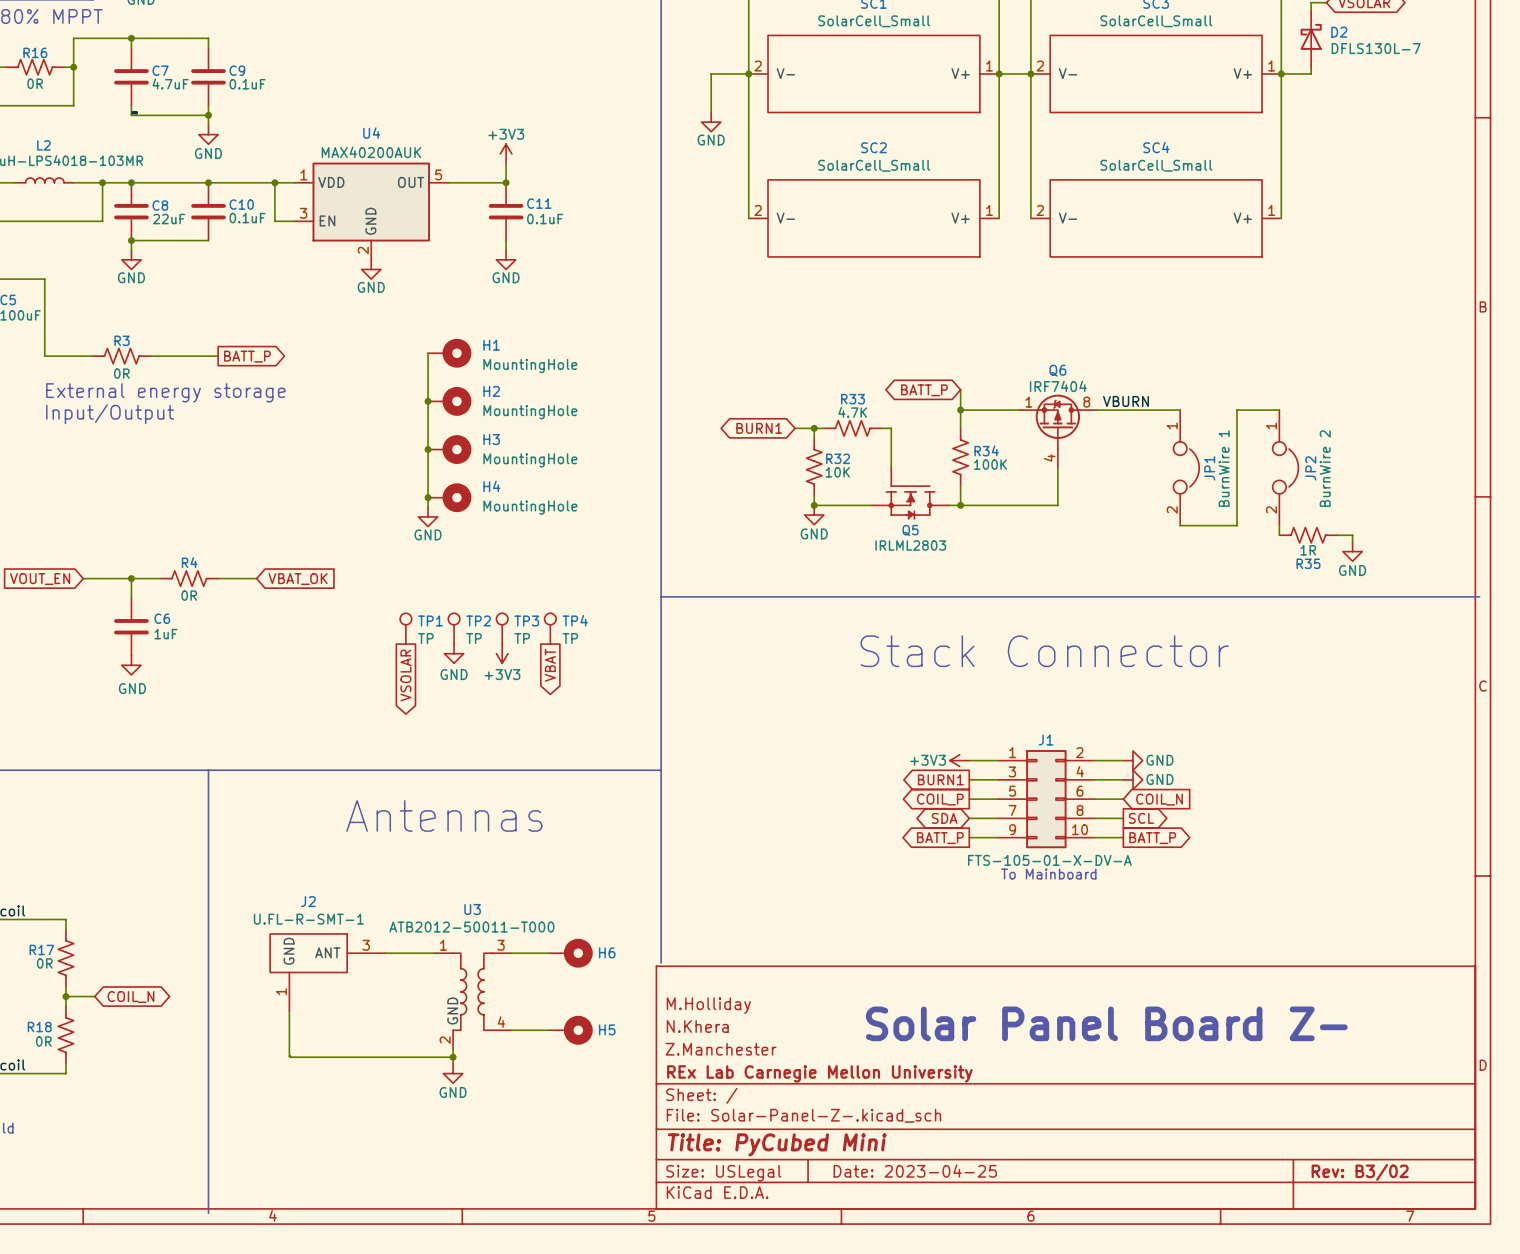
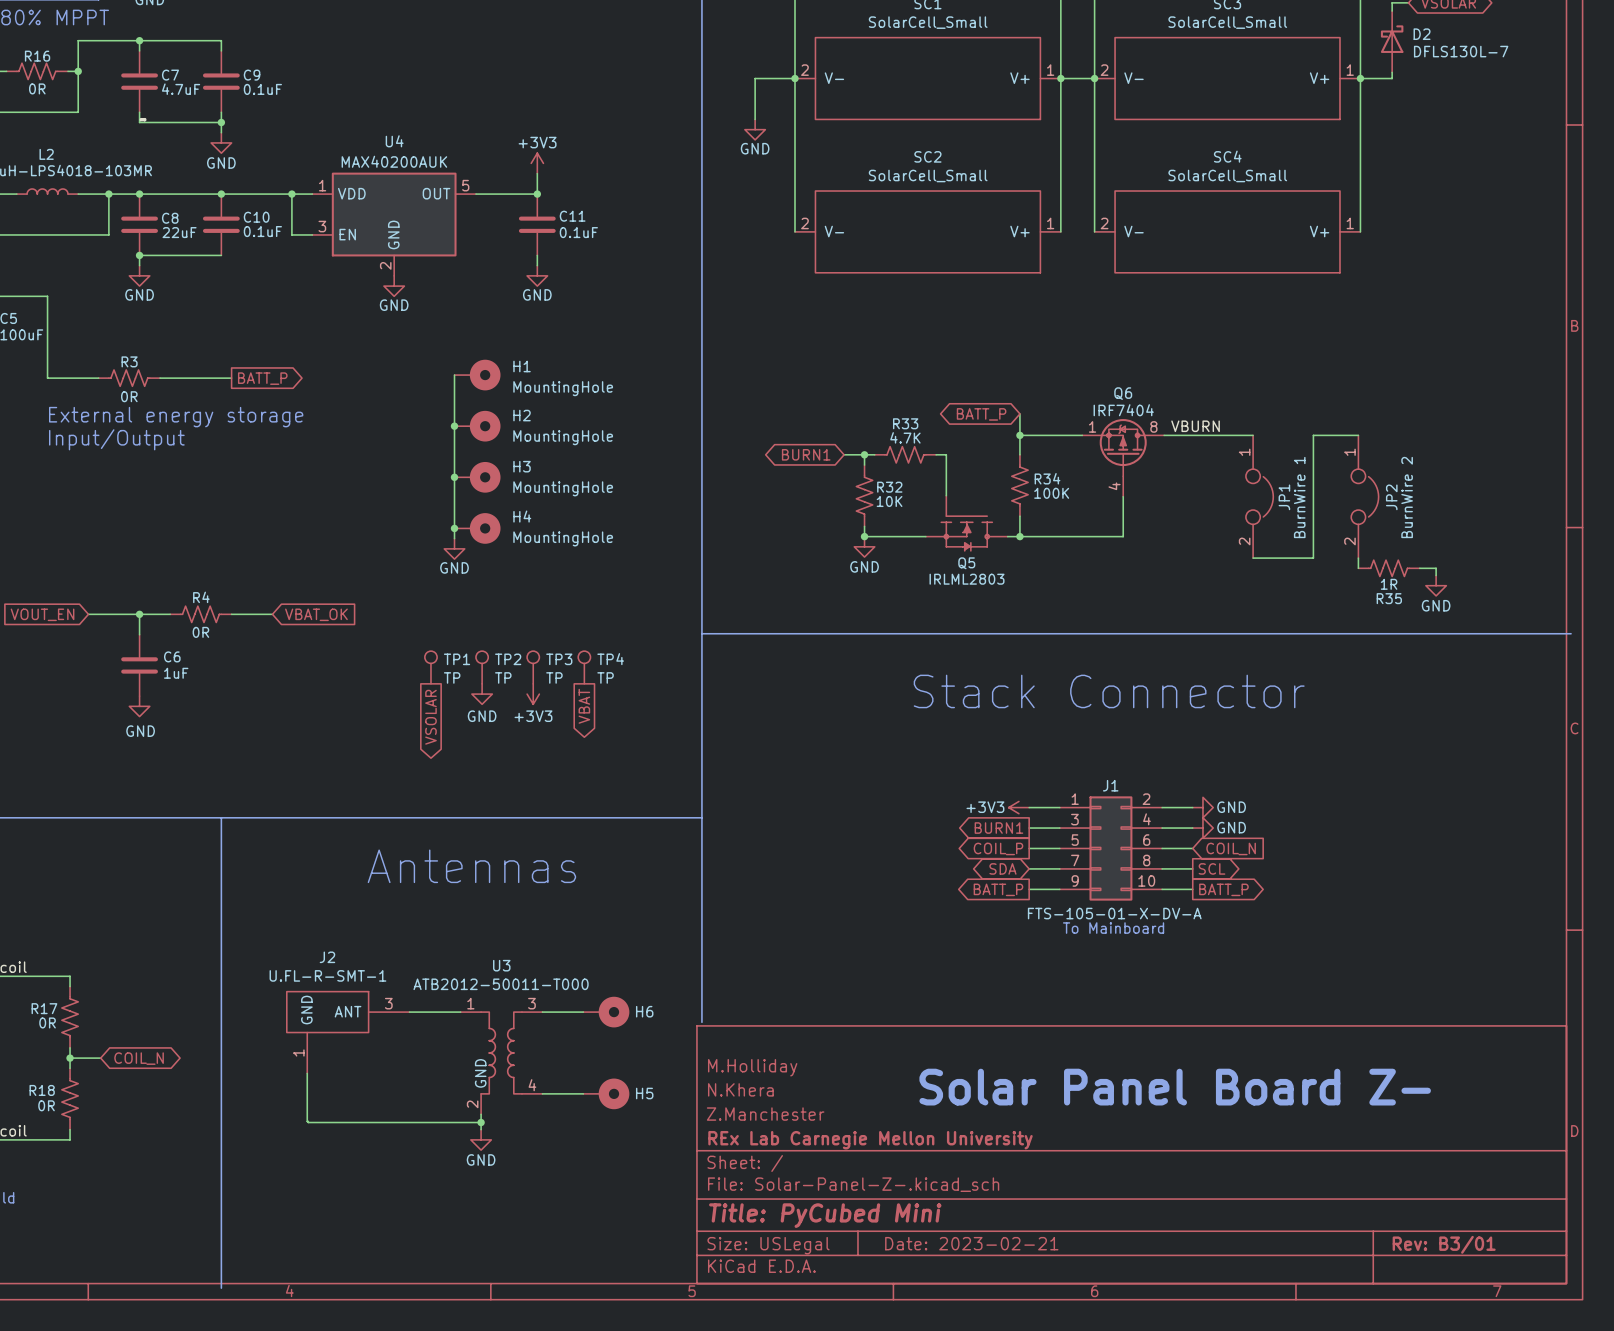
title block: Date: 2023-04-25 (915, 1171) -> Date: 2023-02-21 (971, 1243)
title block: Rev: B3/02 (1360, 1172) -> Rev: B3/01 (1444, 1244)

